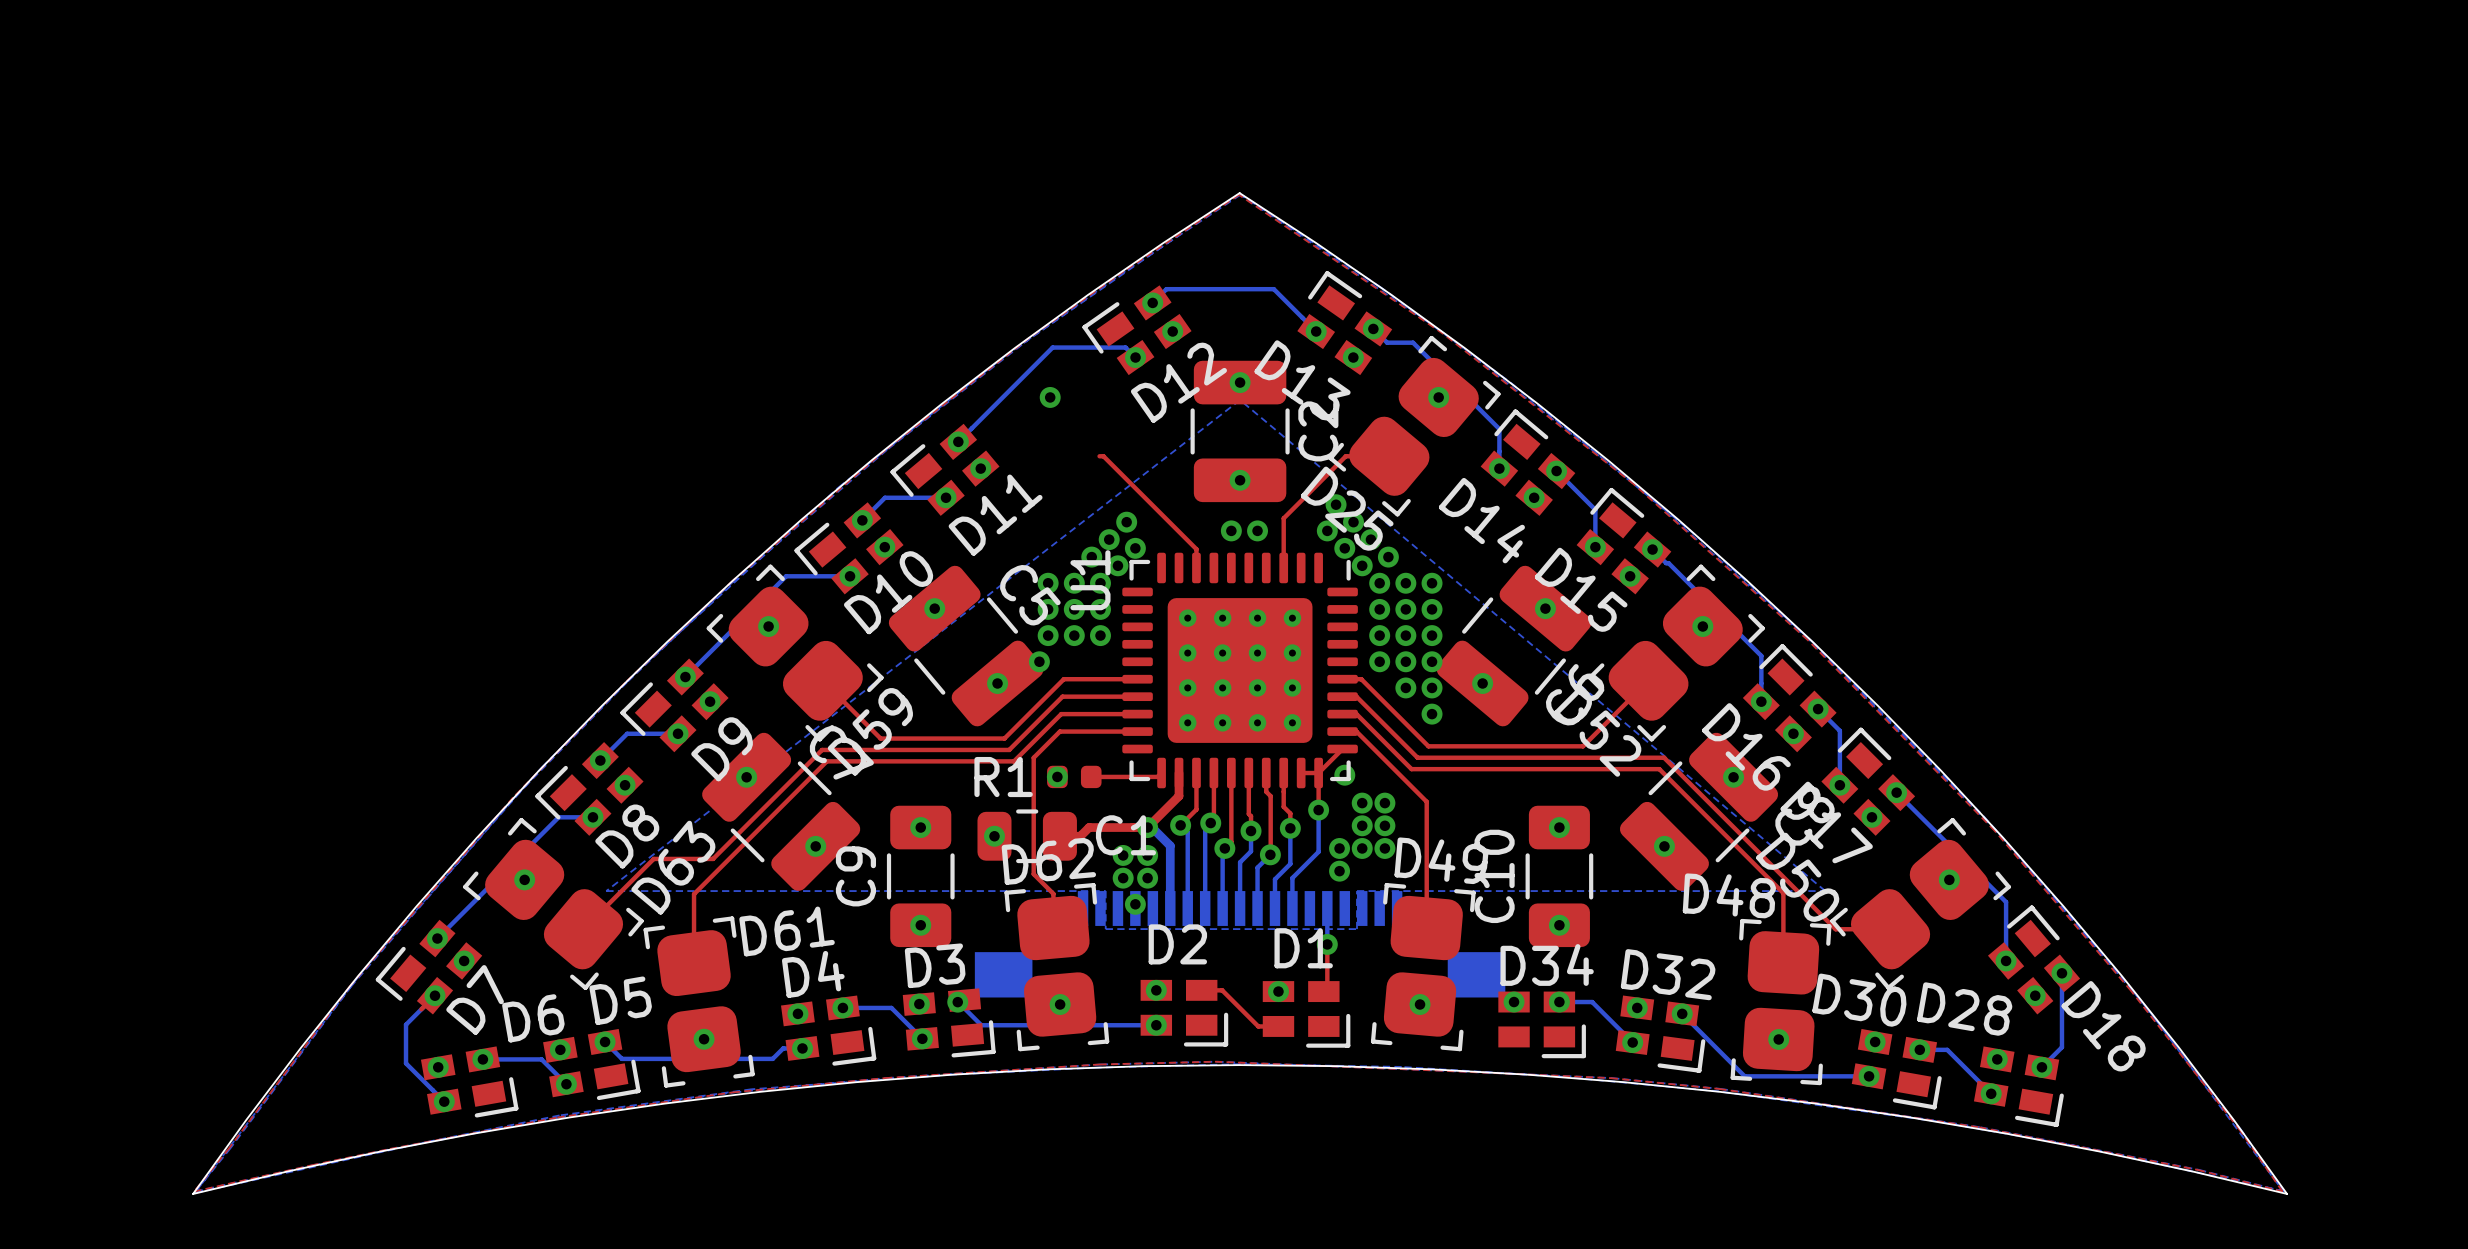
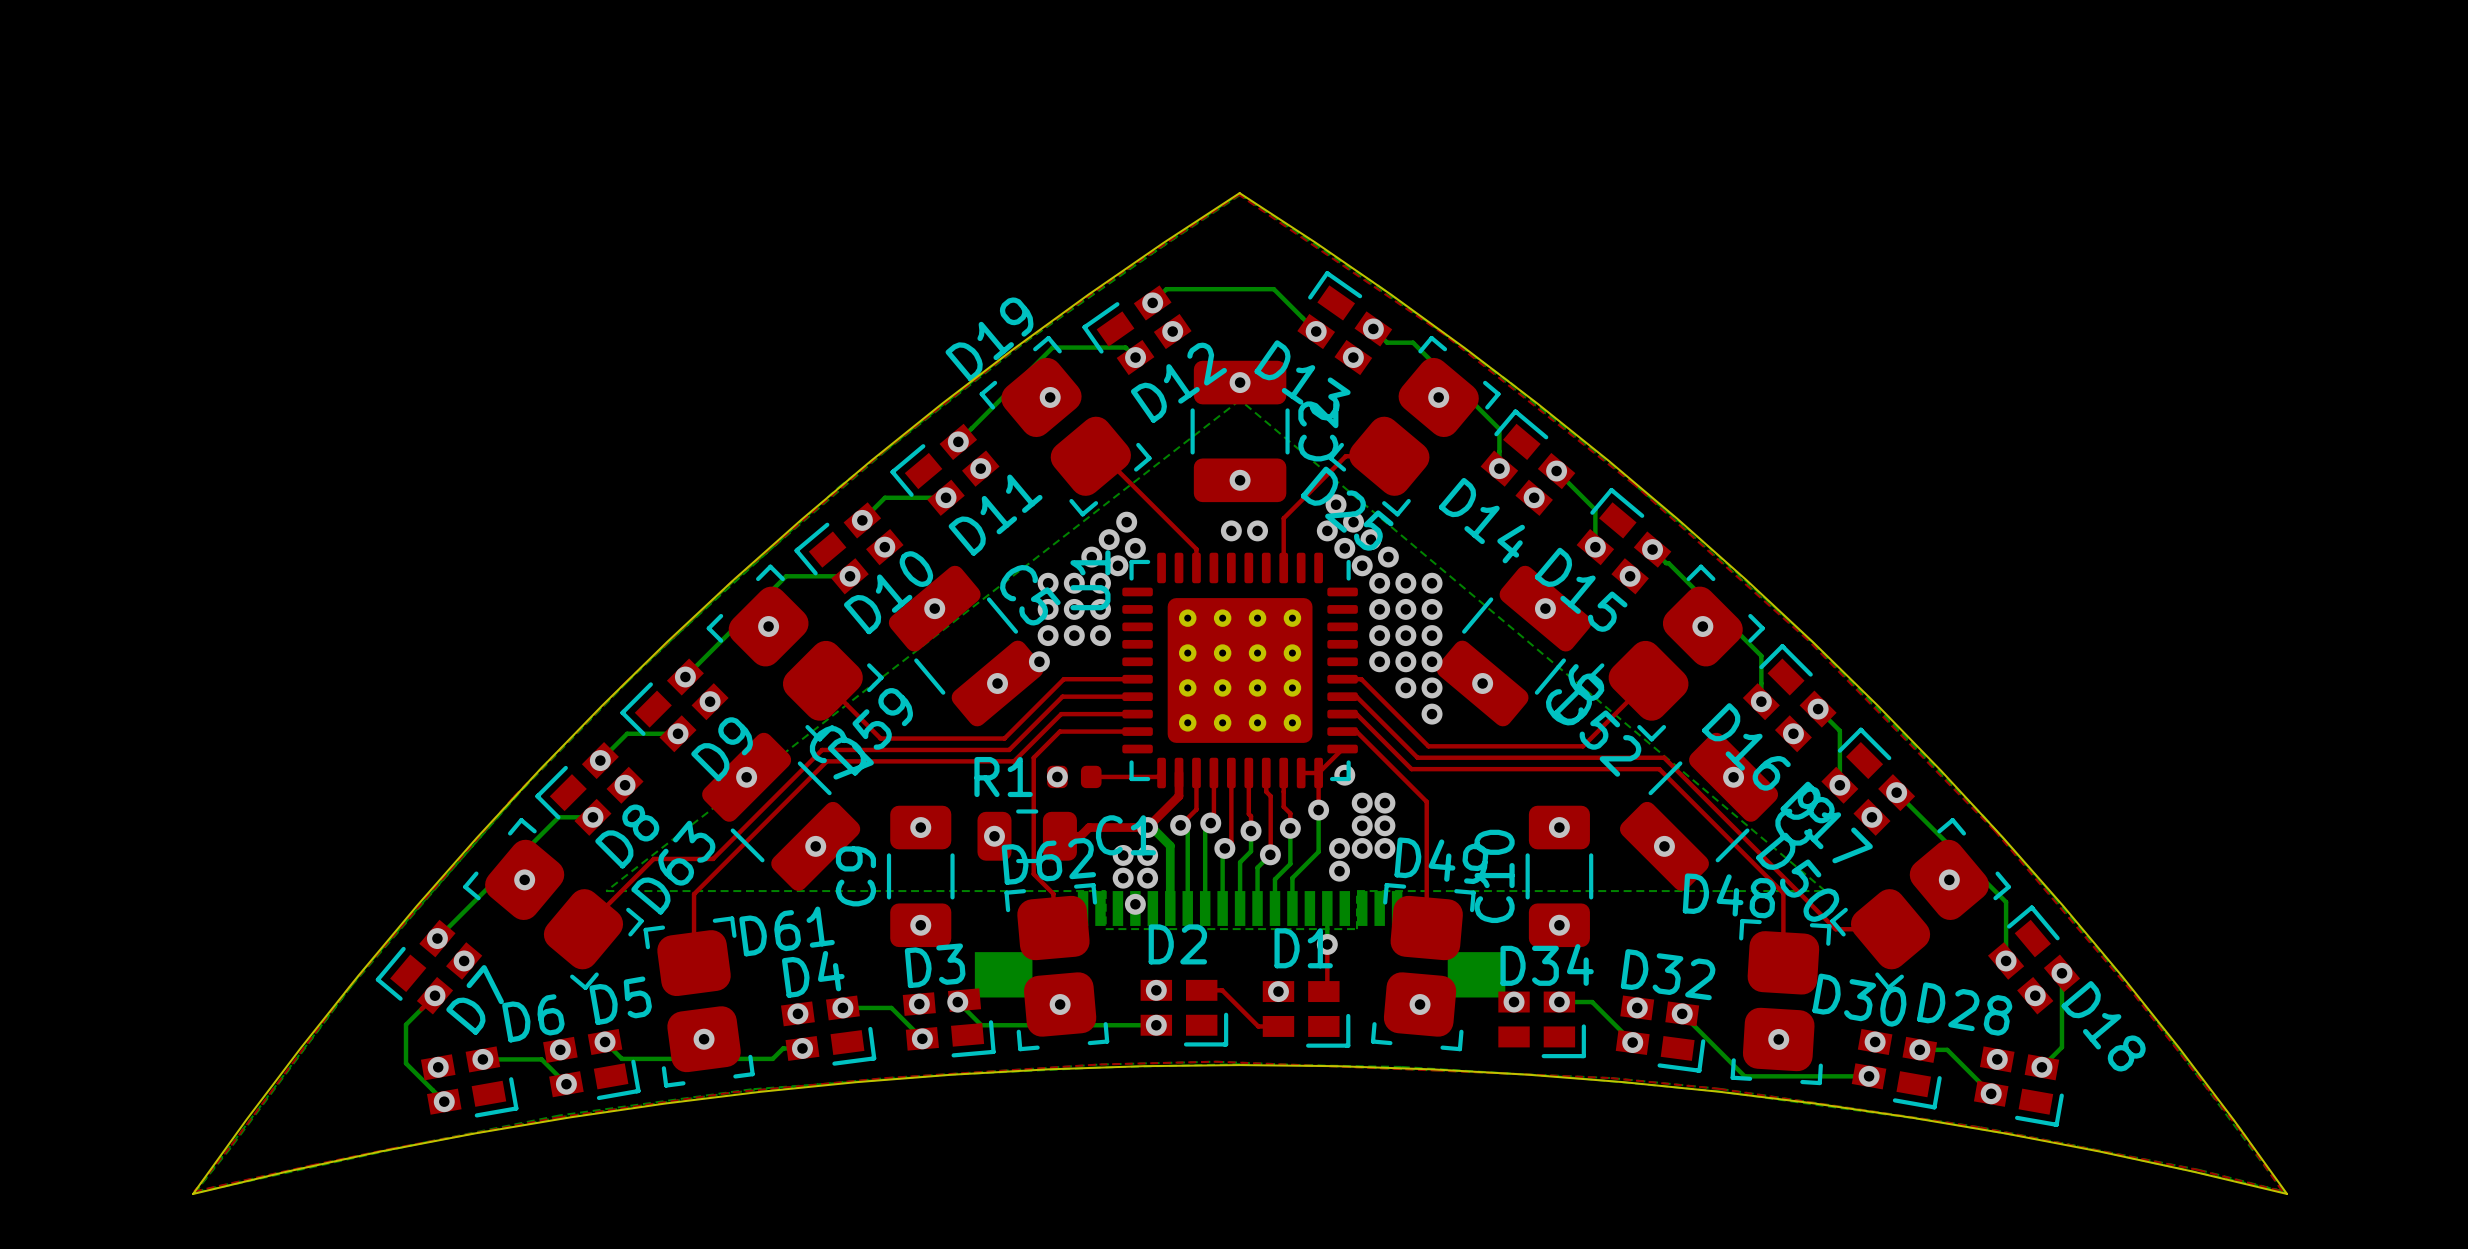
D19: none -> (1065, 426)

